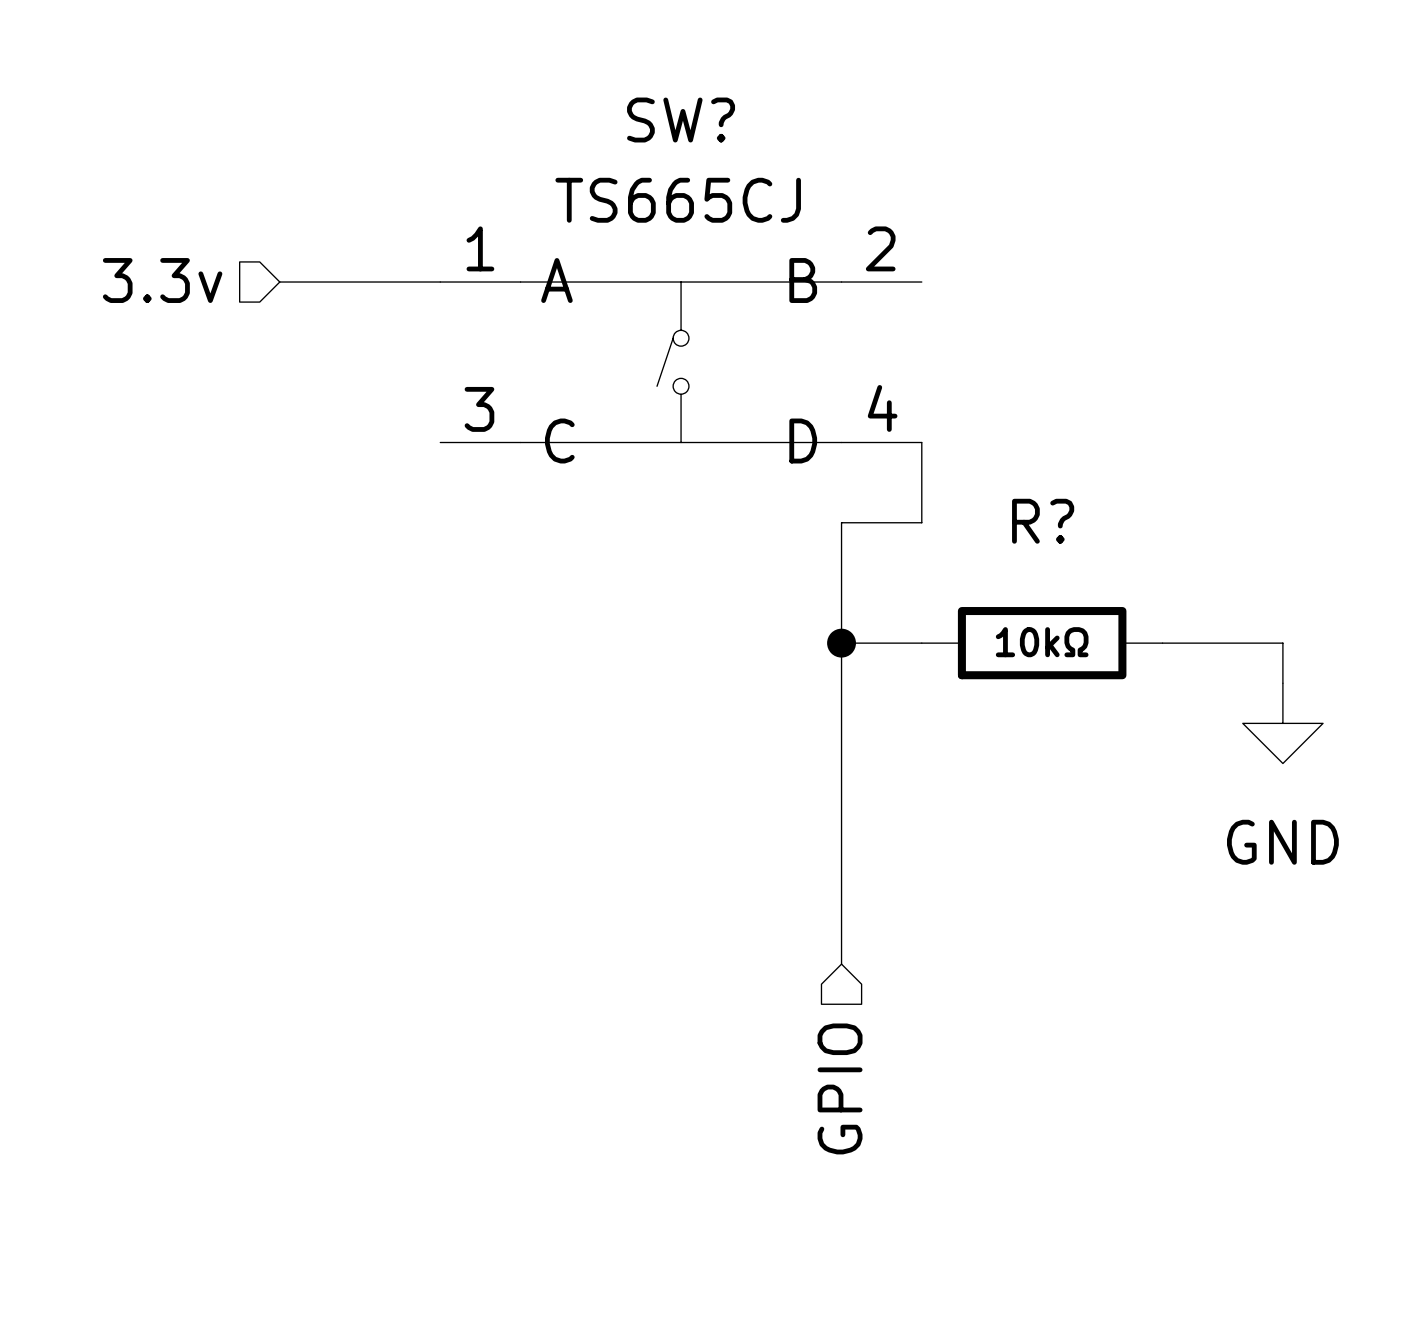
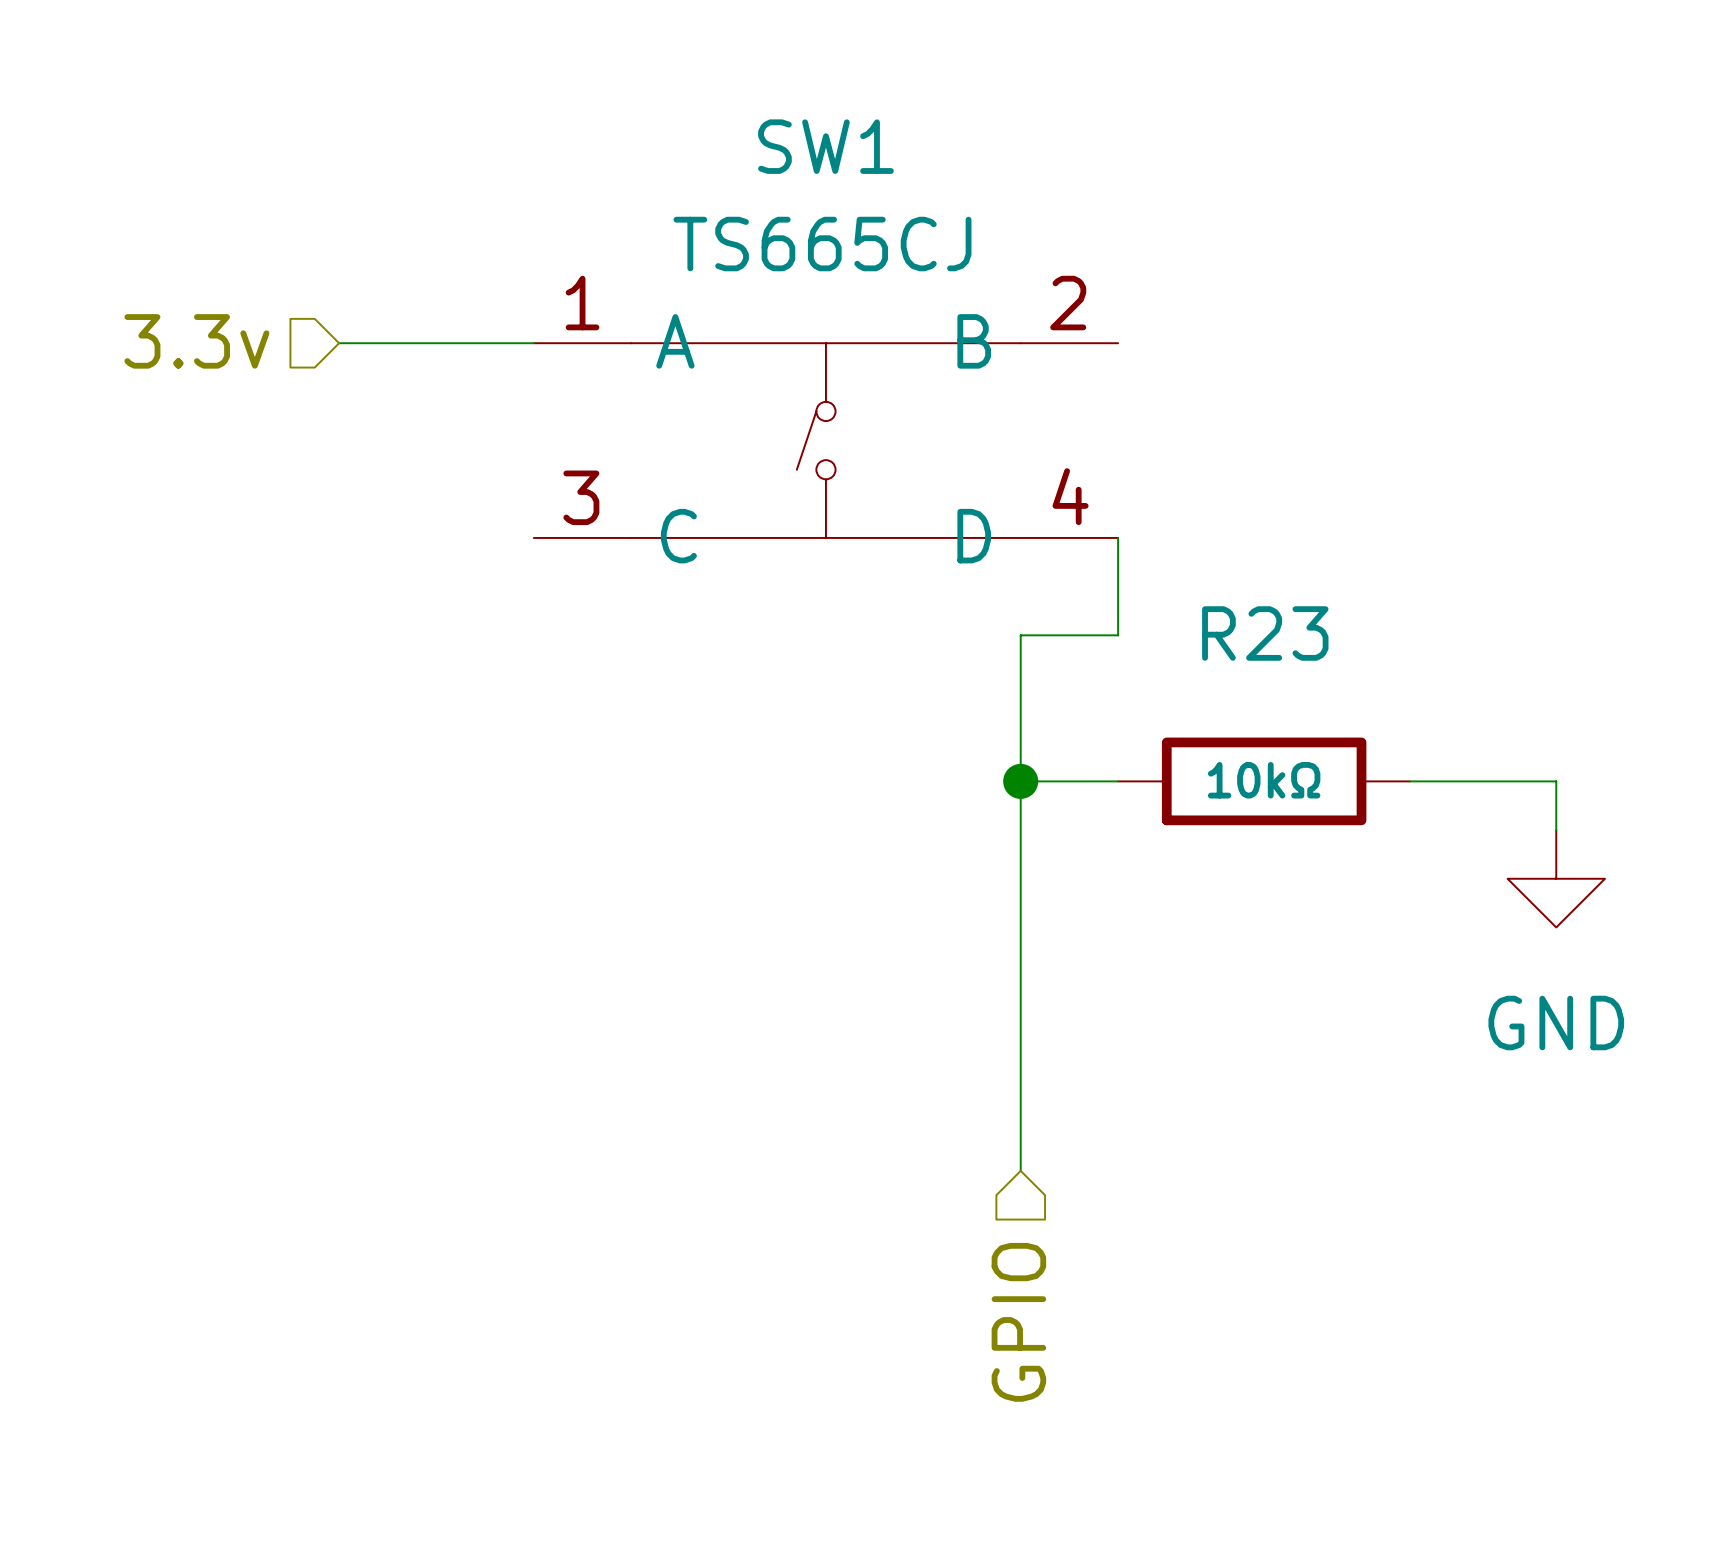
SW? name: SW? (681, 120) -> SW1 (825, 146)
R? name: R? (1043, 521) -> R23 (1265, 633)

